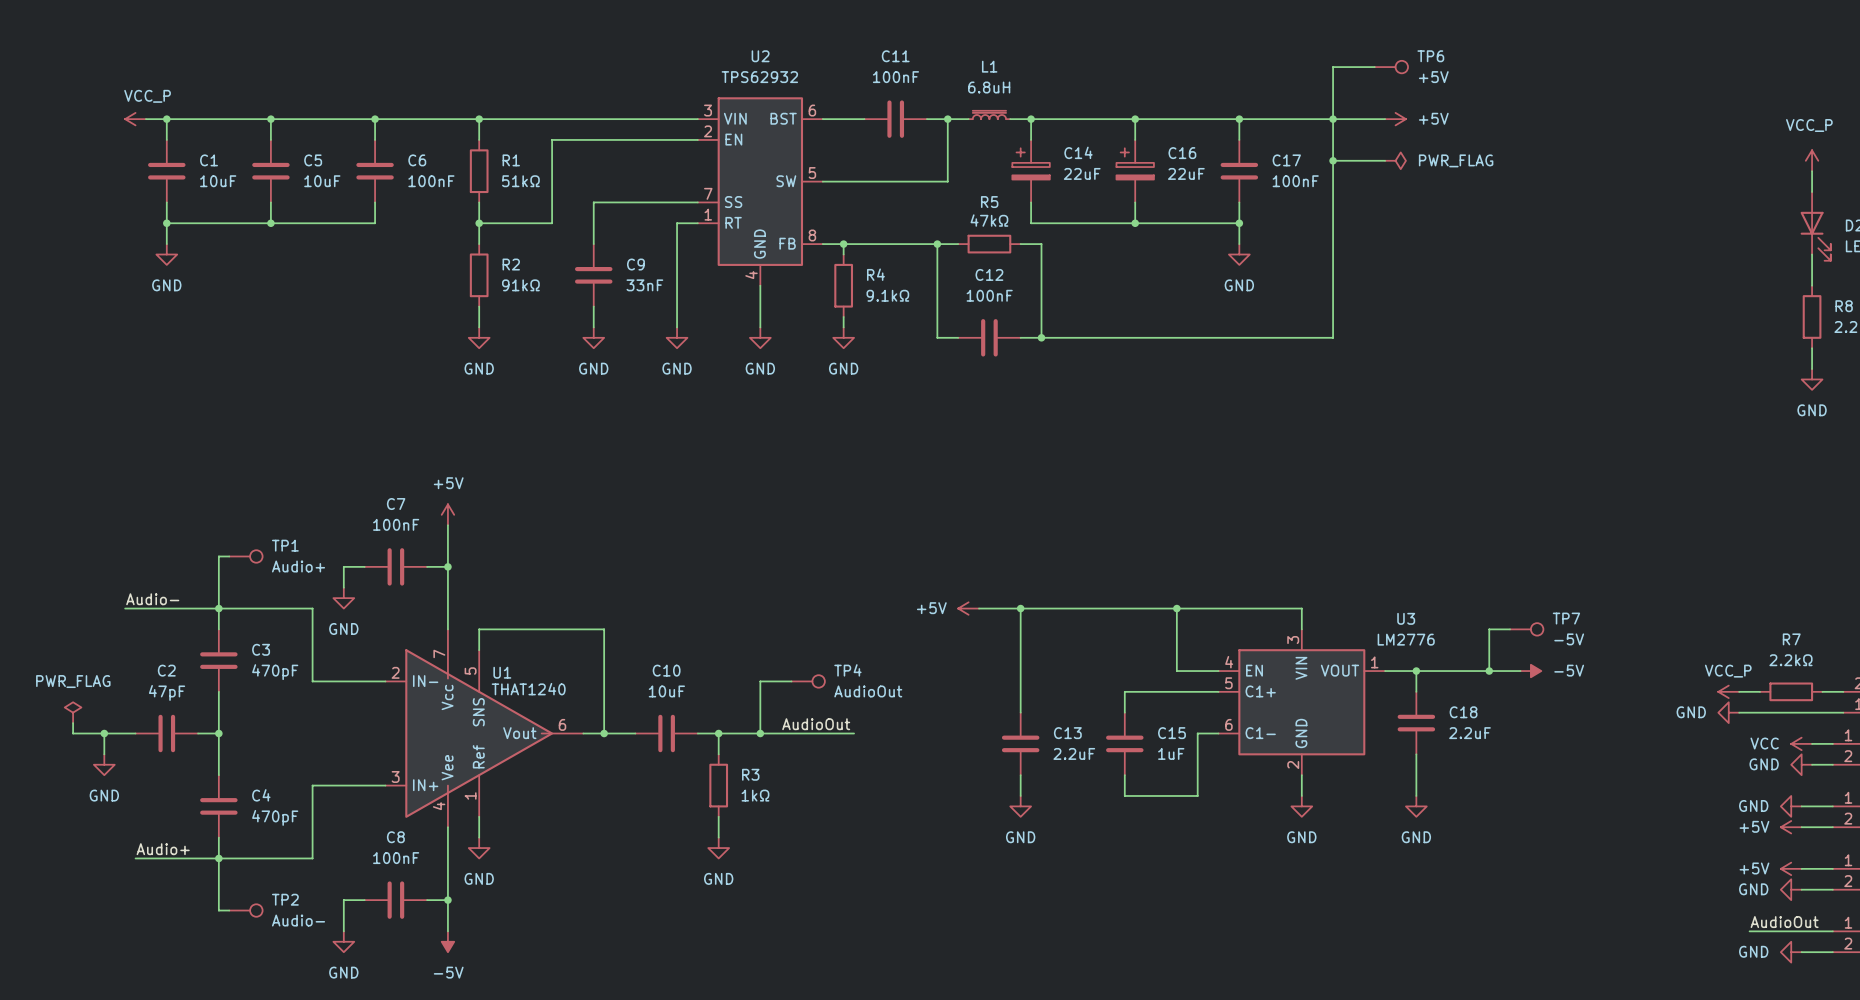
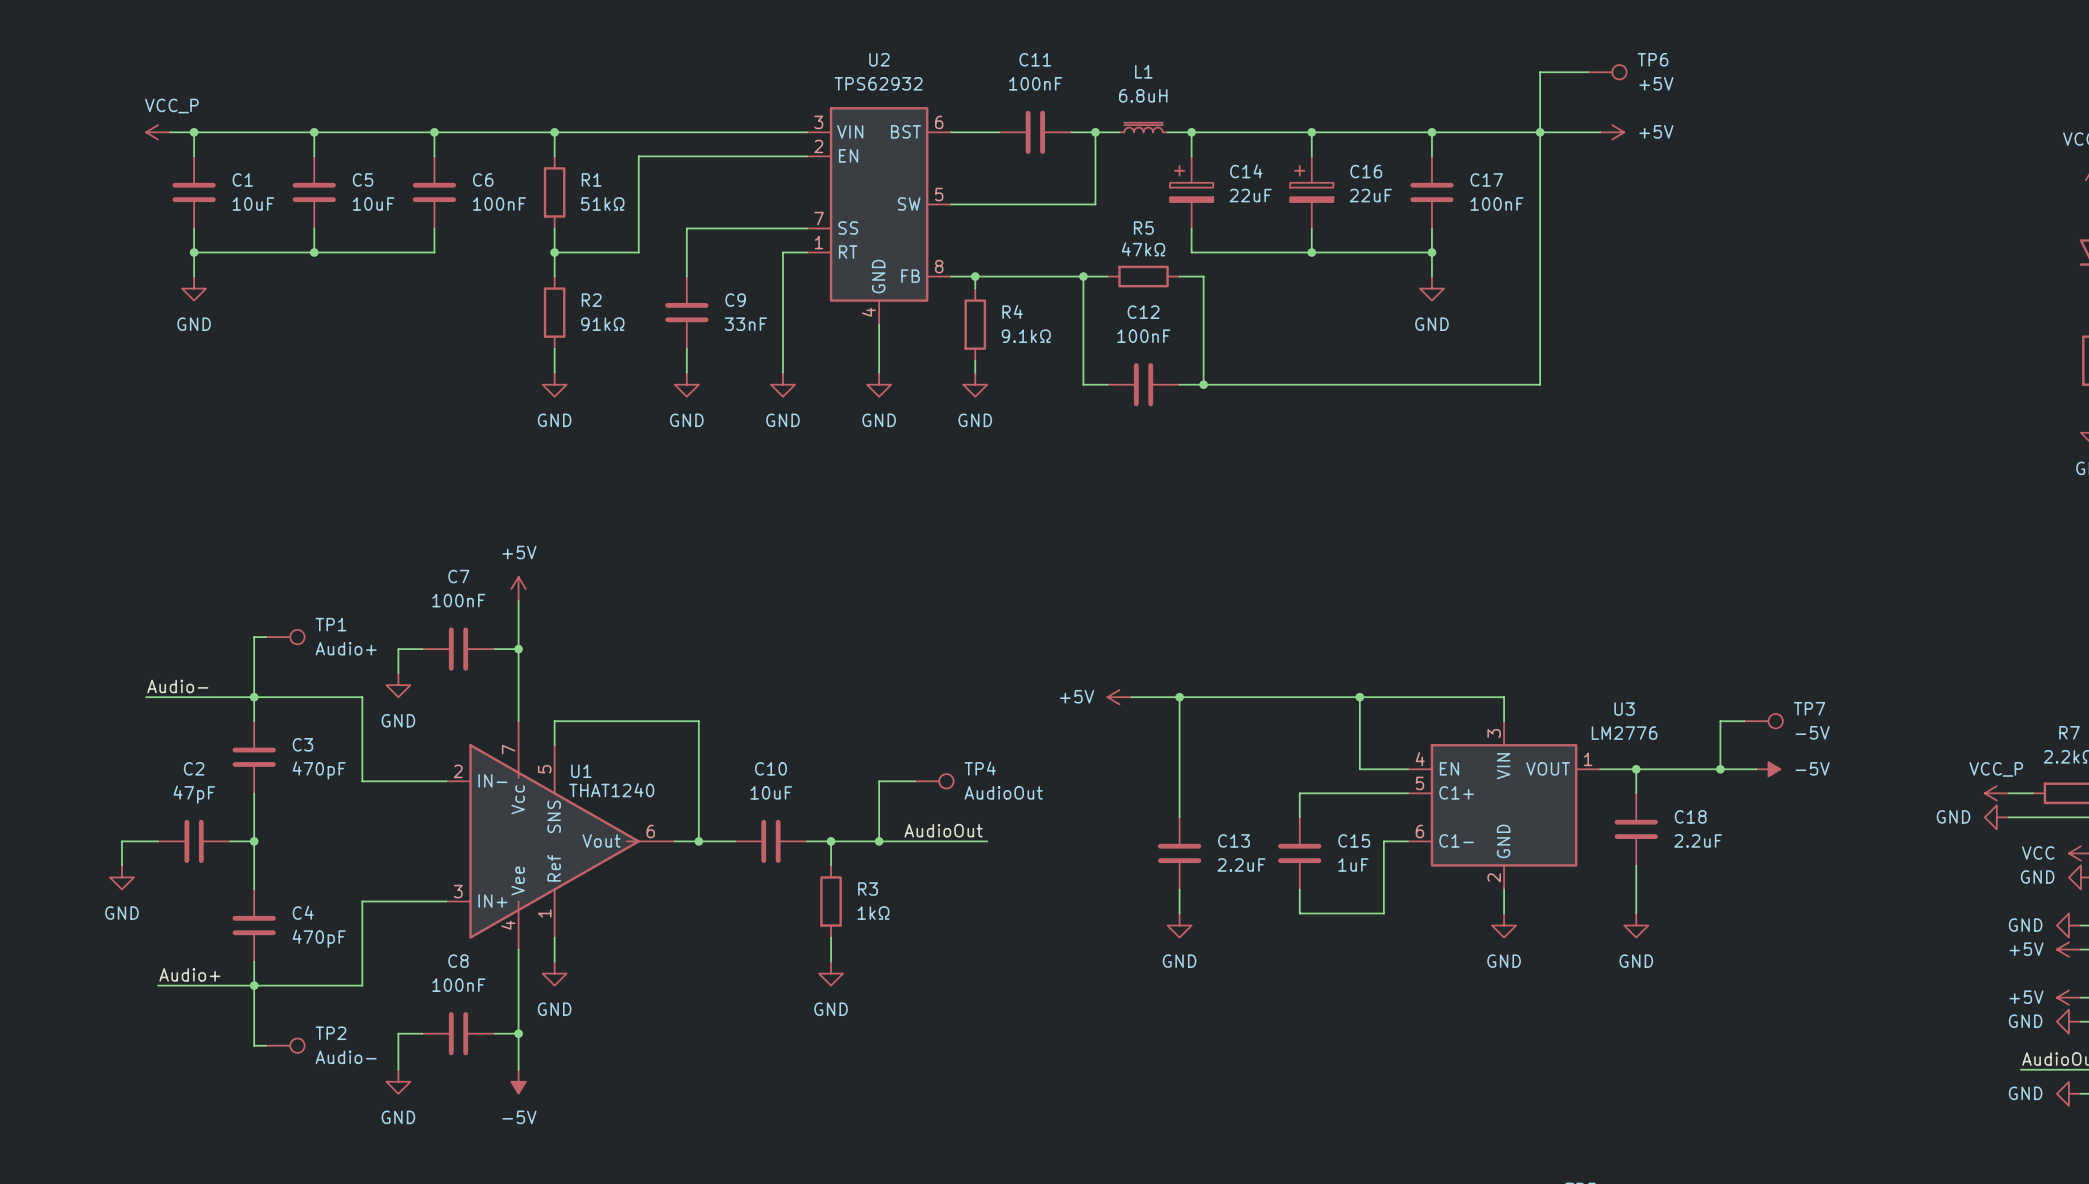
wire: (1333, 160) (1385, 160) -> none
junction: (1333, 160) -> none
power symbol: PWR_FLAG (1395, 160) -> none
power symbol: PWR_FLAG (73, 712) -> none
wire: (73, 723) (73, 733) (104, 733) -> none
junction: (104, 733) -> none

